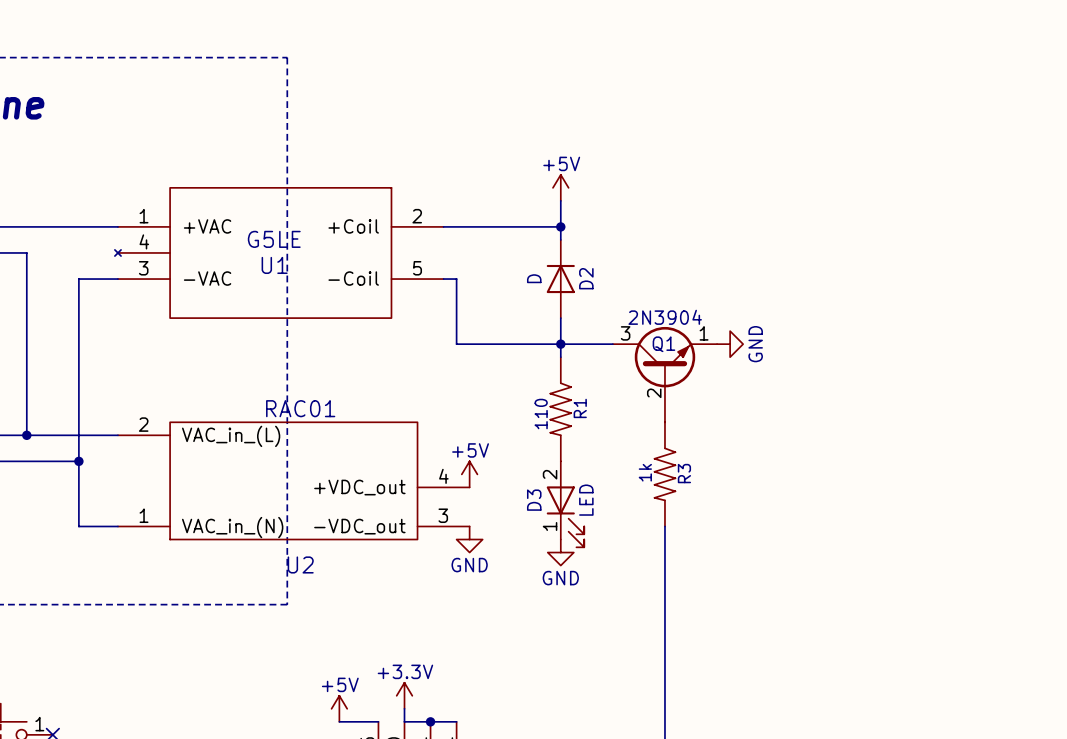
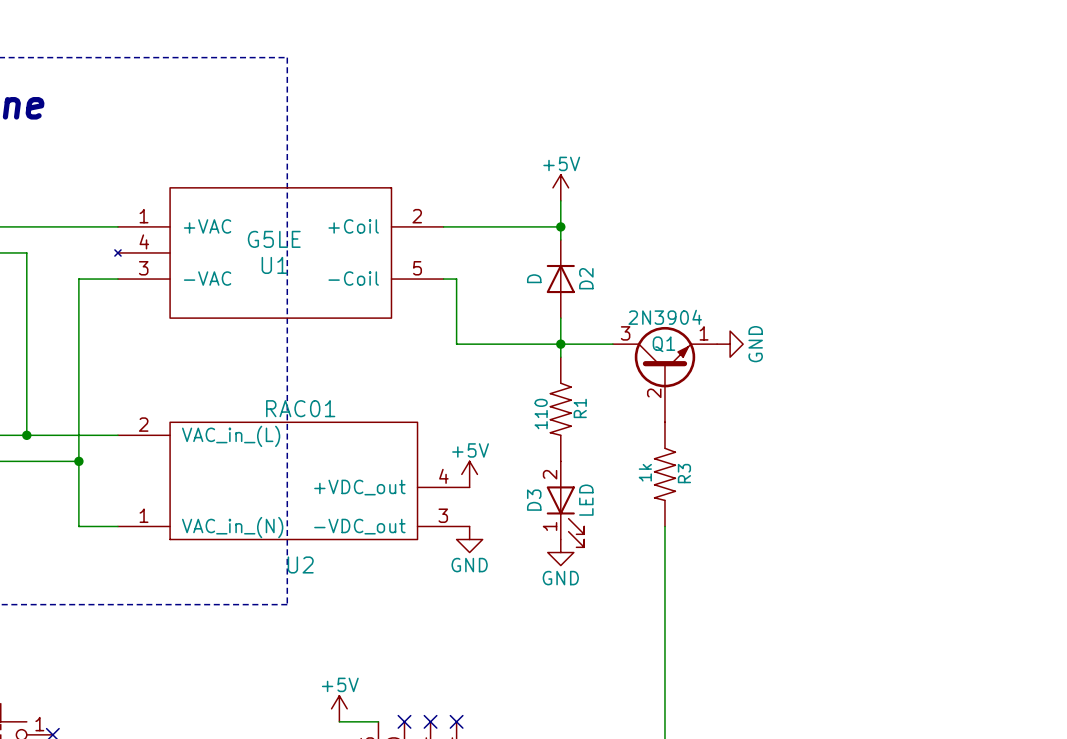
power symbol: +3.3V (404, 695) -> none
wire: (404, 708) (404, 721) (456, 721) -> none
no-connect mark: none -> (404, 721)
junction: (430, 721) -> none
no-connect mark: none -> (430, 721)
no-connect mark: none -> (456, 721)

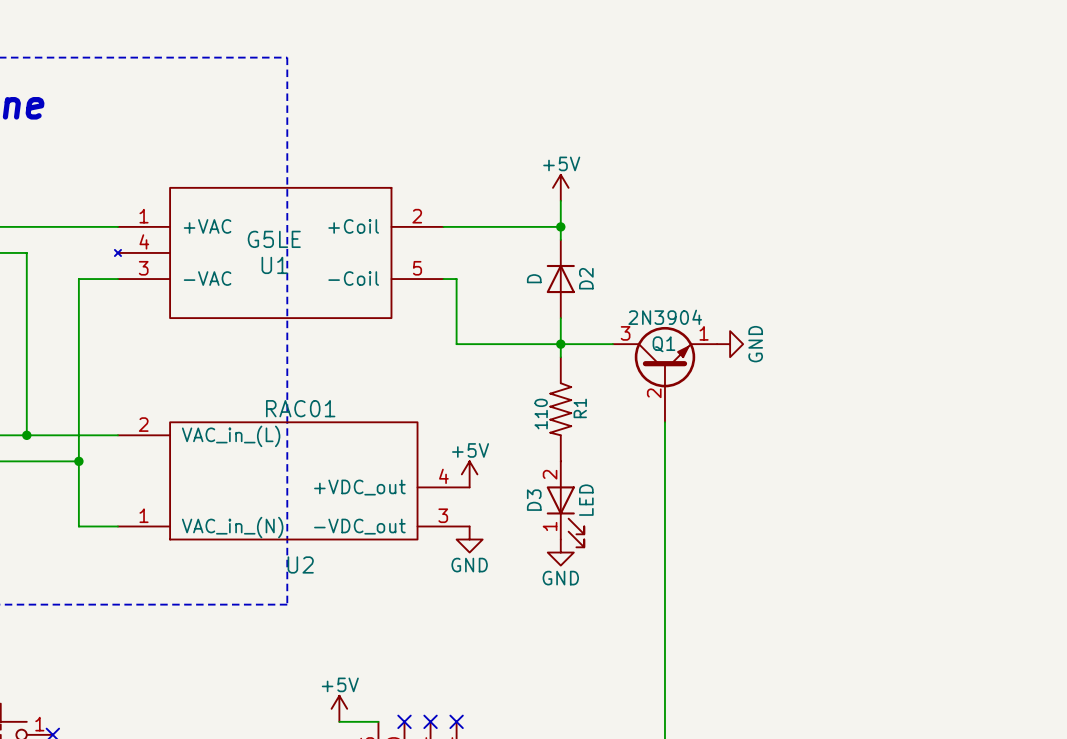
R3: 1k (664, 474) -> none

